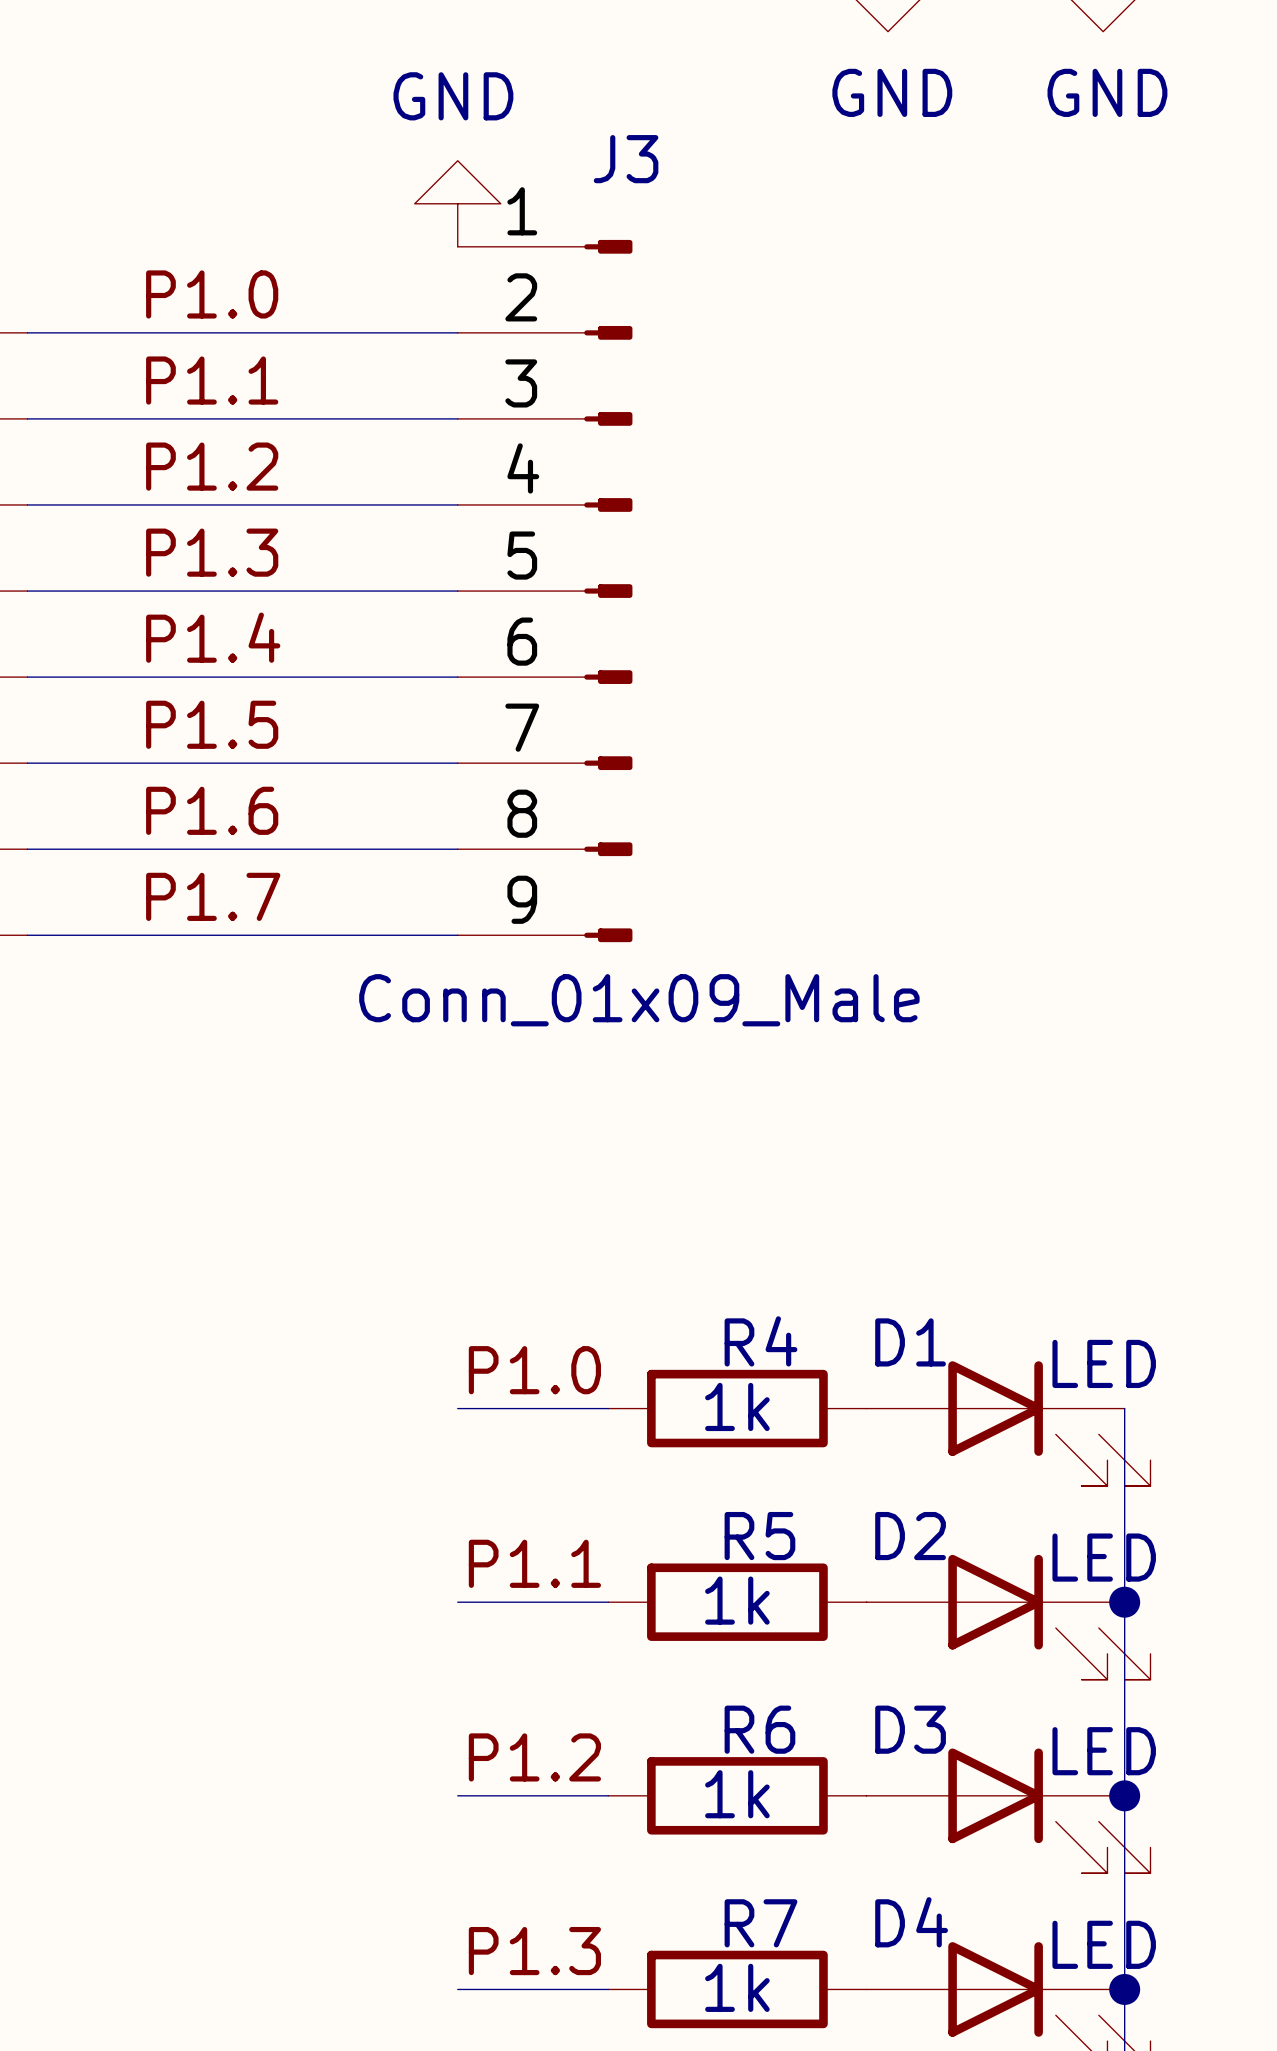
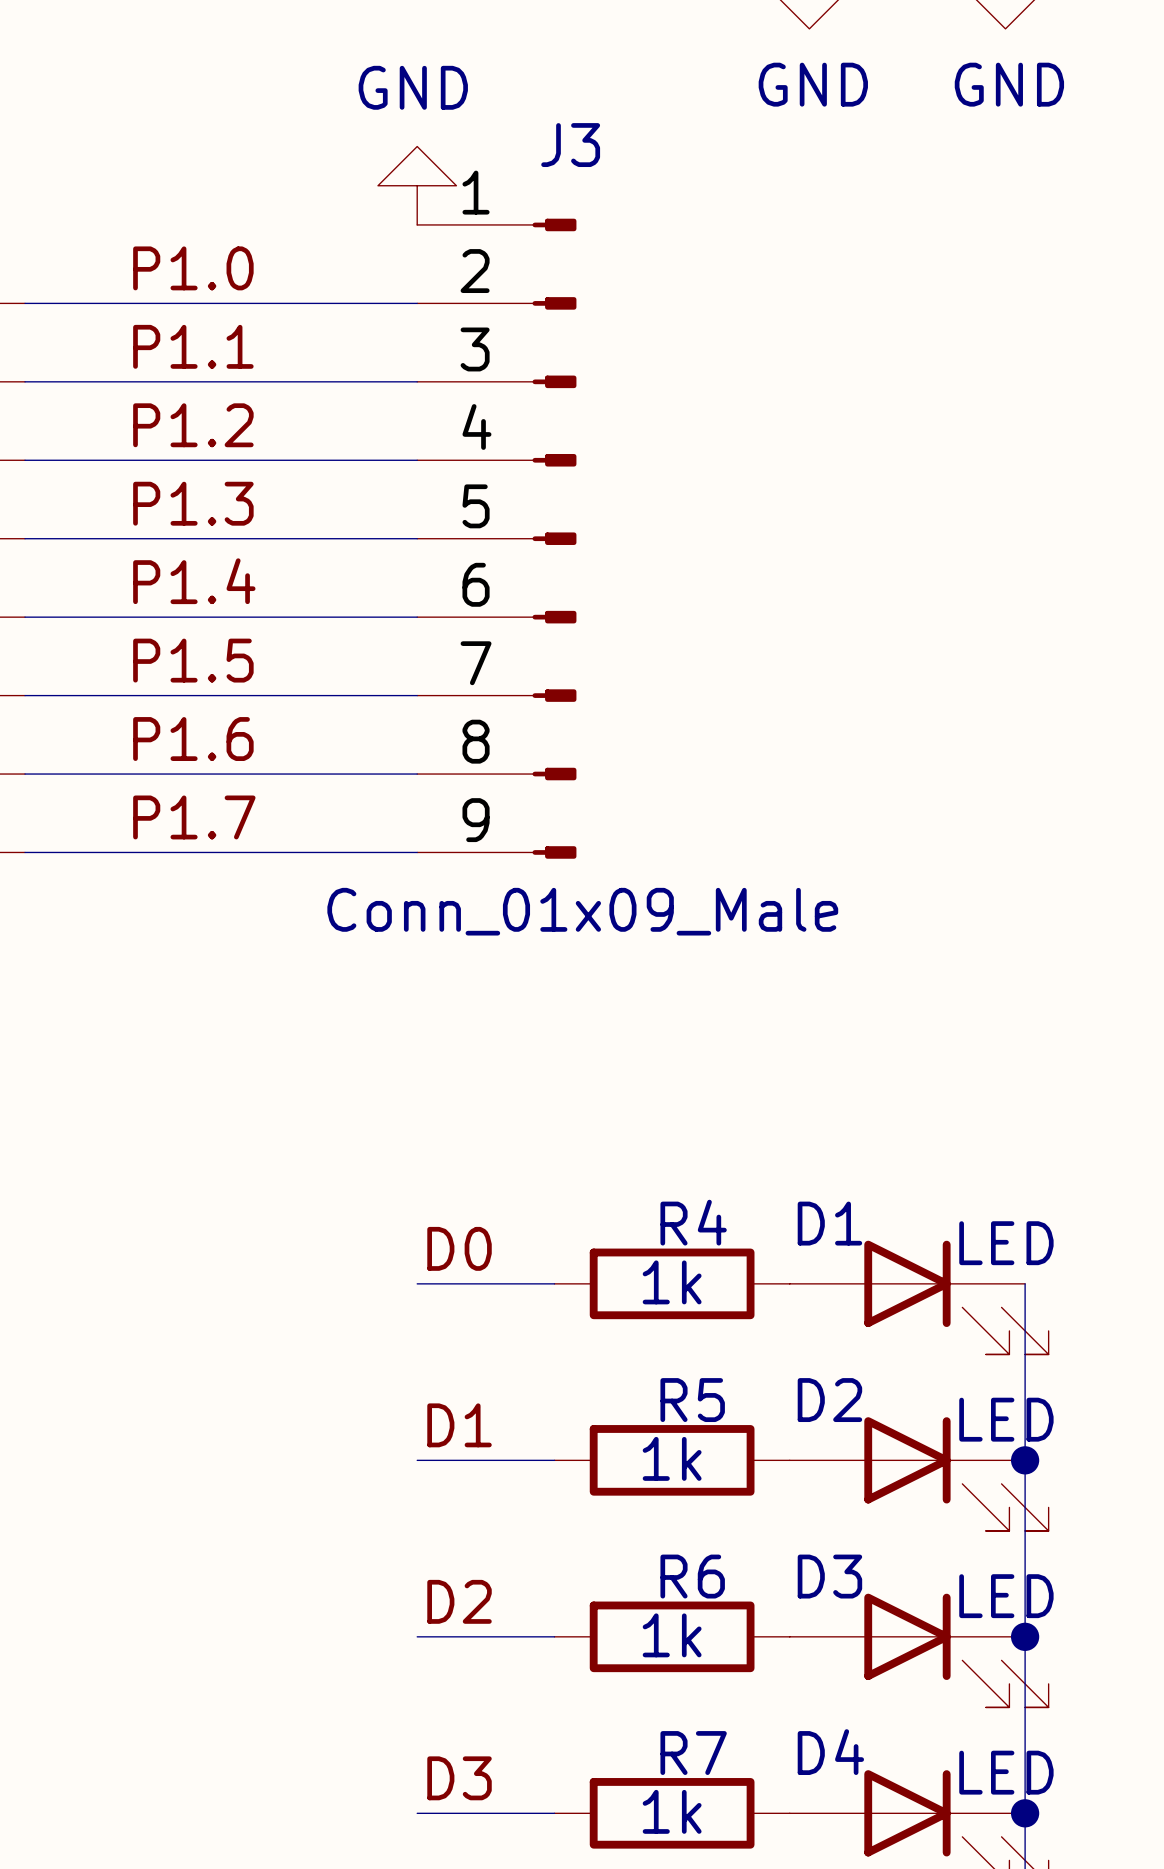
label: P1.0 (534, 1370) -> D0 (459, 1248)
label: P1.1 (534, 1563) -> D1 (459, 1425)
label: P1.2 (534, 1757) -> D2 (459, 1601)
label: P1.3 (534, 1951) -> D3 (459, 1778)

